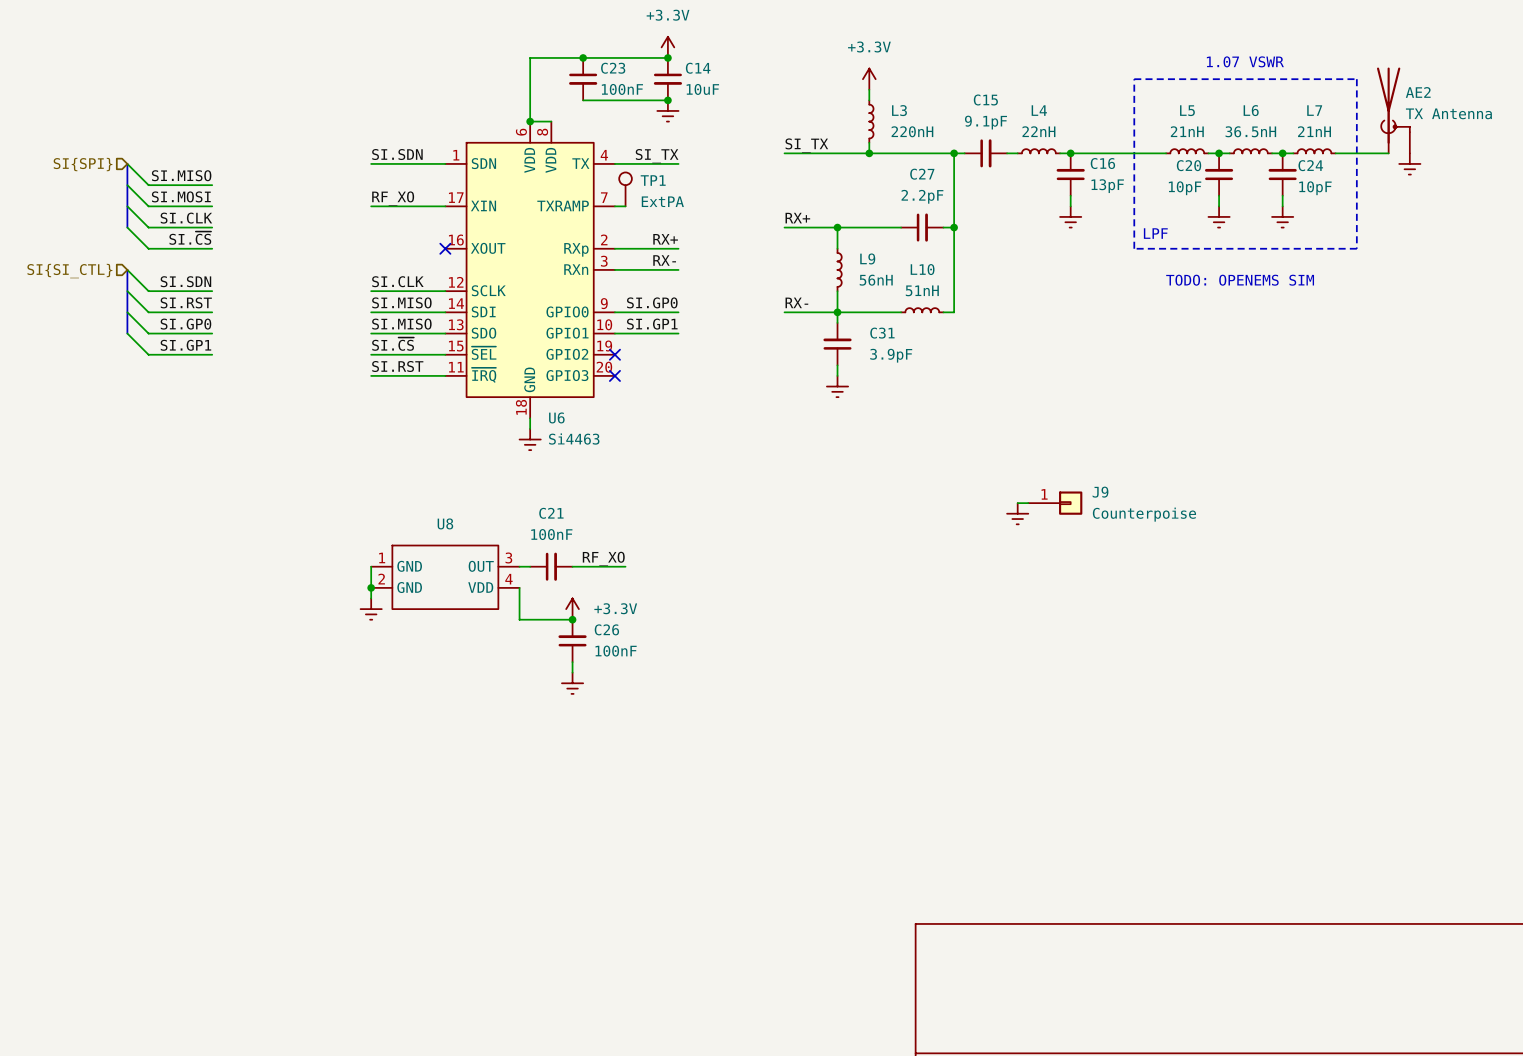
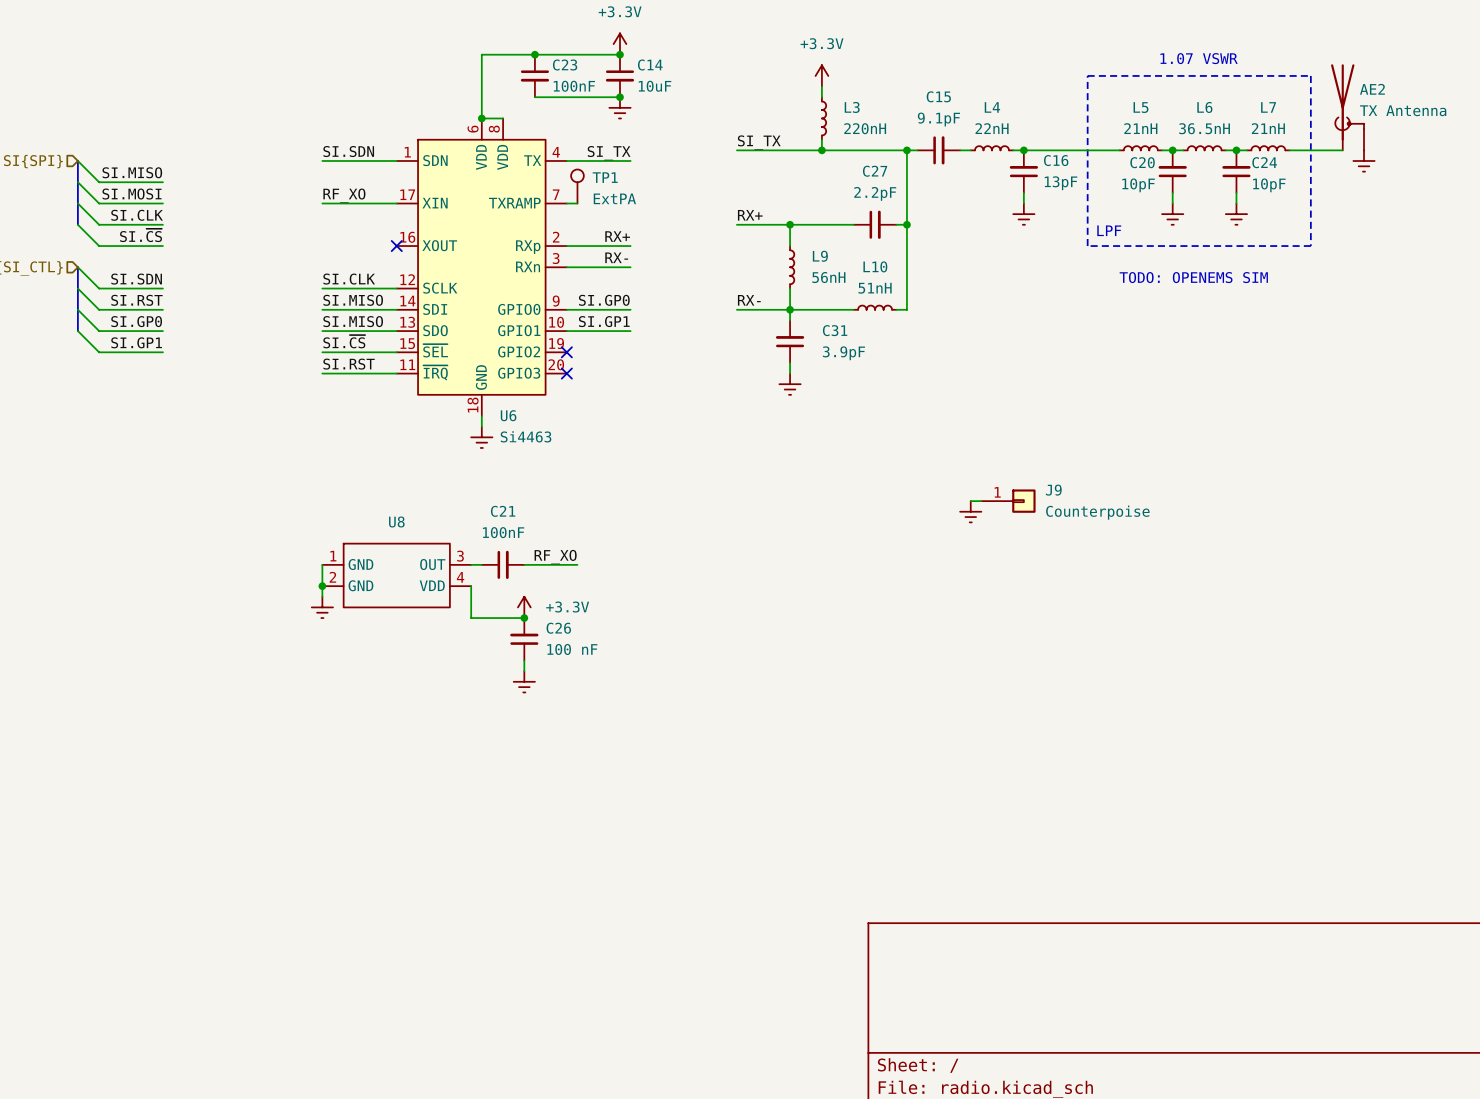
C26 value: 100nF (616, 651) -> 100 nF (572, 649)

